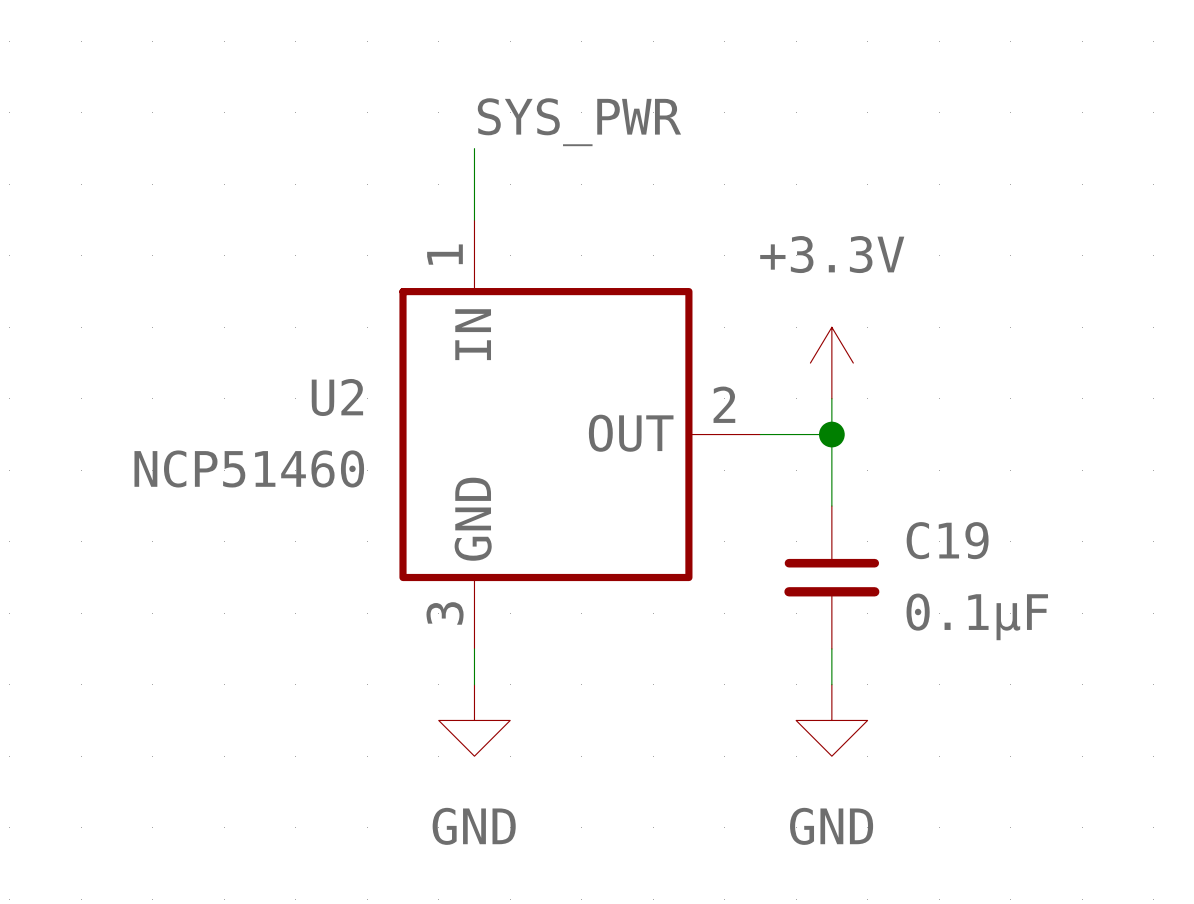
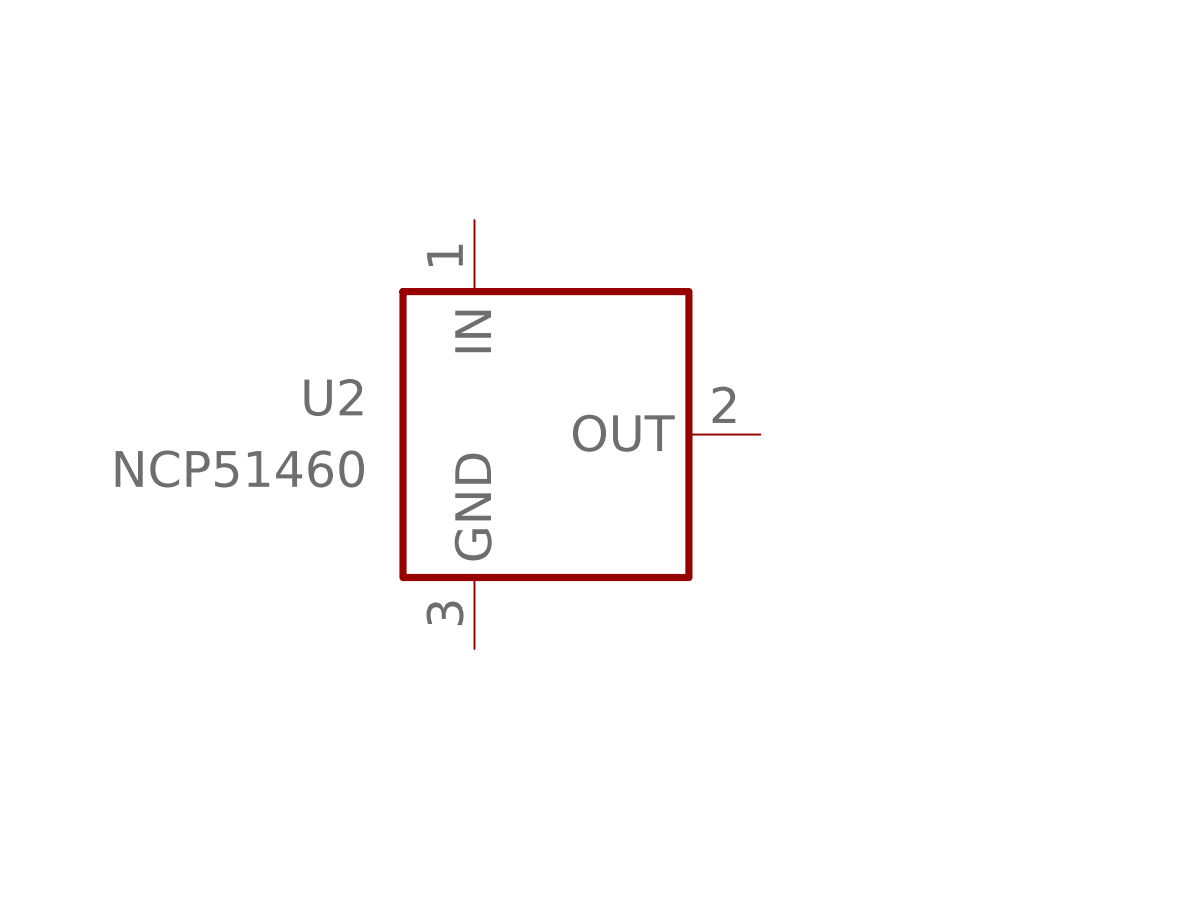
label: SYS_PWR (579, 122) -> none
wire: (474, 148) (474, 220) -> none
power symbol: +3.3V (831, 363) -> none
wire: (831, 398) (831, 506) -> none
wire: (760, 434) (831, 434) -> none
junction: (831, 434) -> none
C19: 0.1µF (831, 577) -> none
wire: (474, 648) (474, 684) -> none
wire: (831, 648) (831, 684) -> none
power symbol: GND (474, 720) -> none
power symbol: GND (831, 720) -> none

